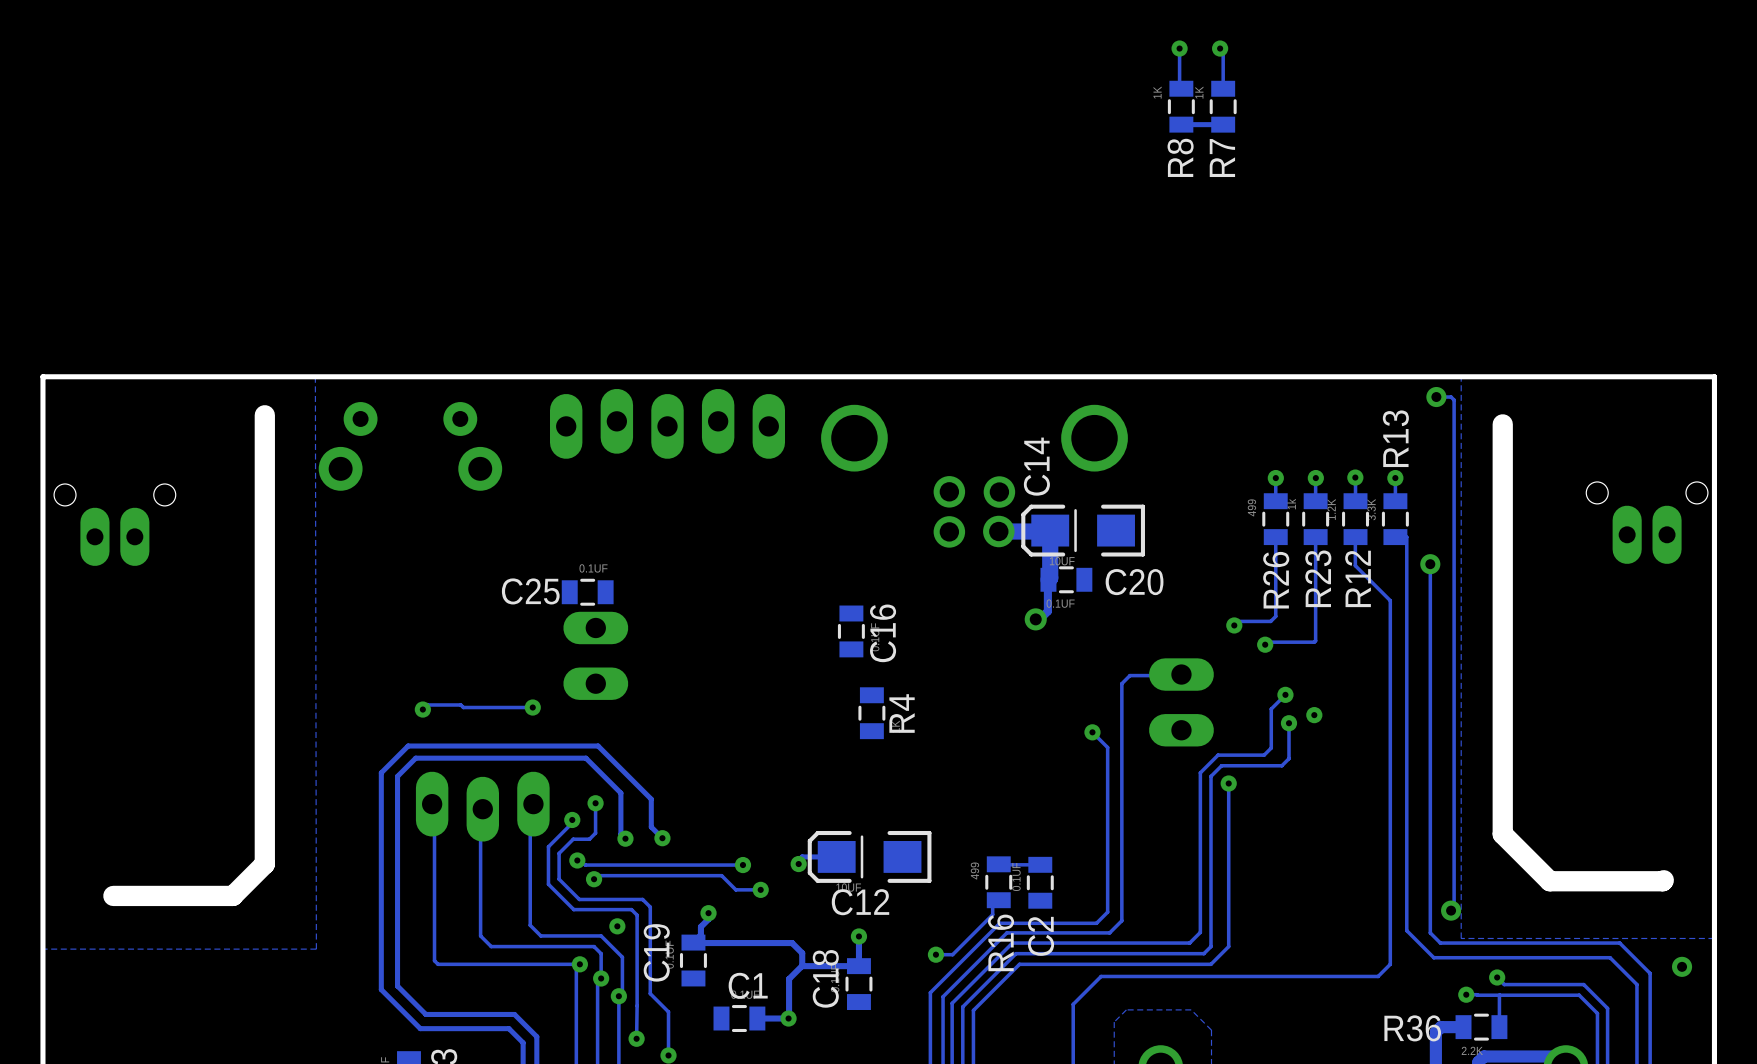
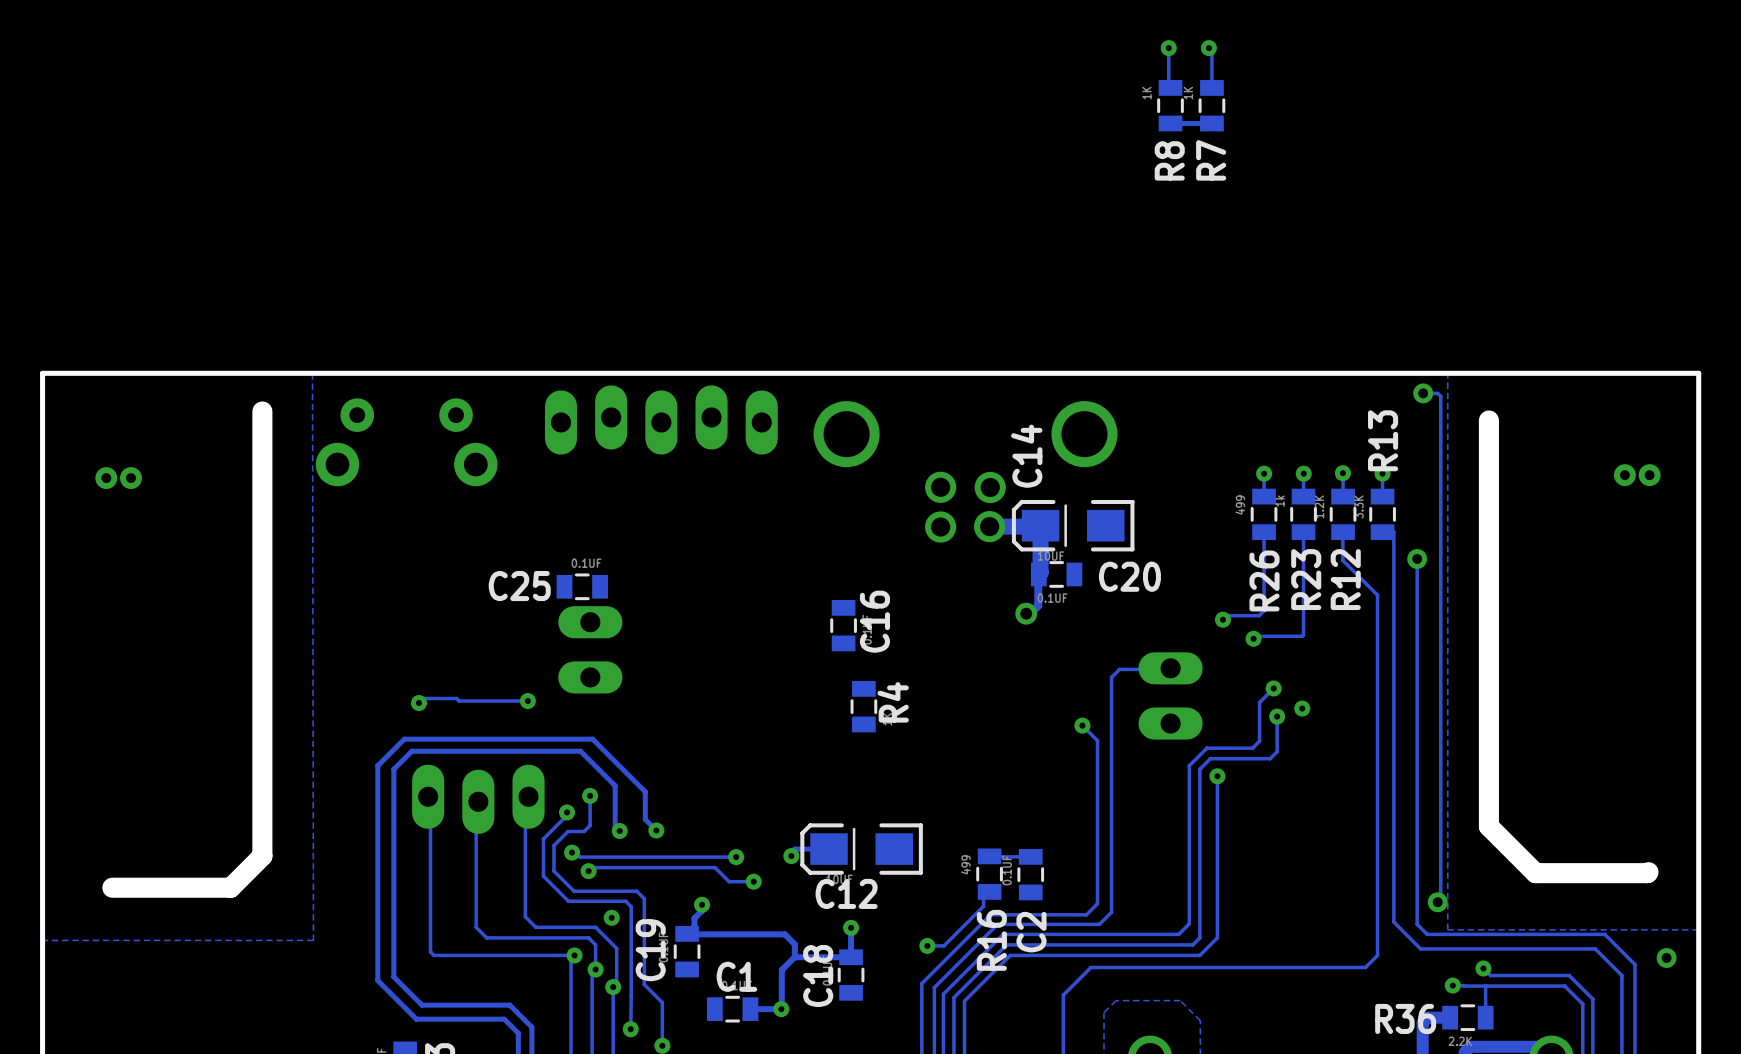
part: none -> (1637, 475)
part: none -> (118, 478)
part: (1647, 522) -> none
part: (114, 524) -> none

